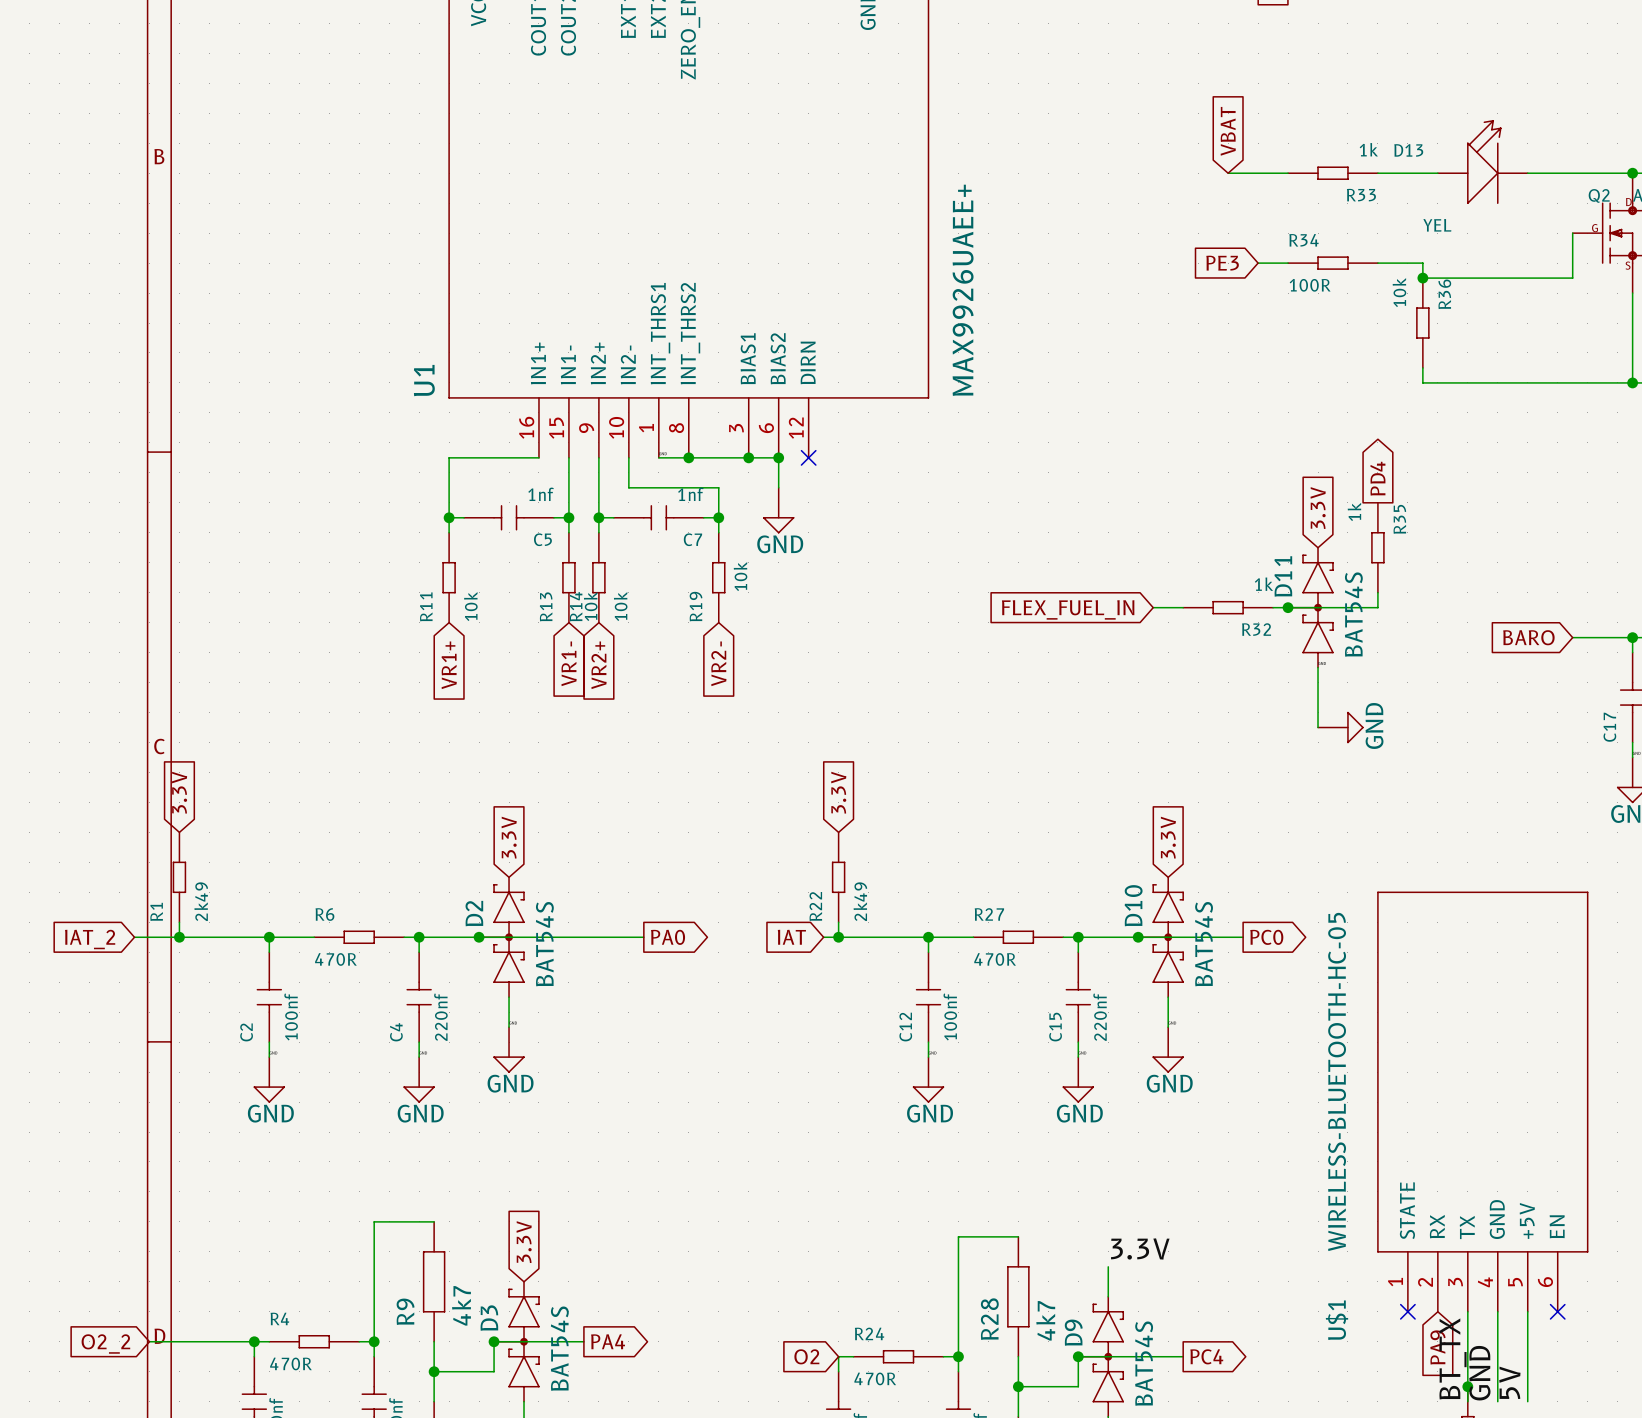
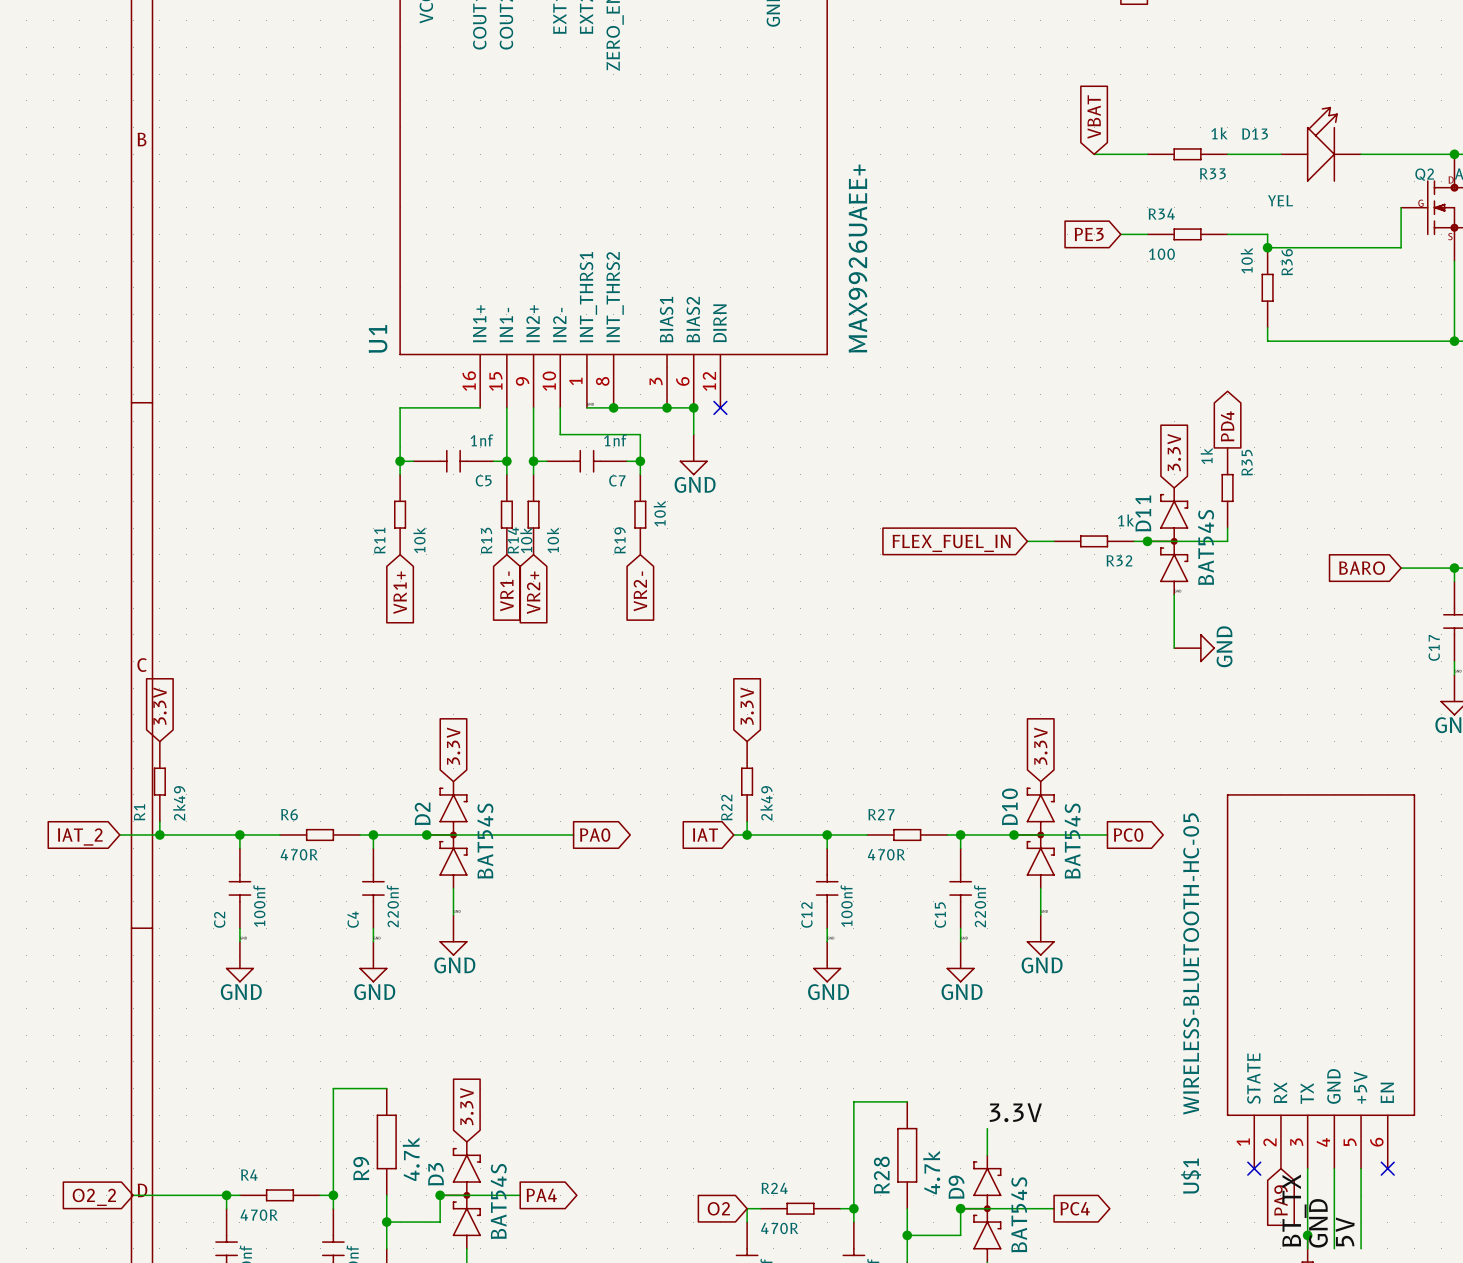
R34 value: 100R (1310, 285) -> 100 (1161, 254)
R9 value: 4k7 (461, 1305) -> 4.7k (411, 1159)
R28 value: 4k7 (1045, 1320) -> 4.7k (931, 1172)

